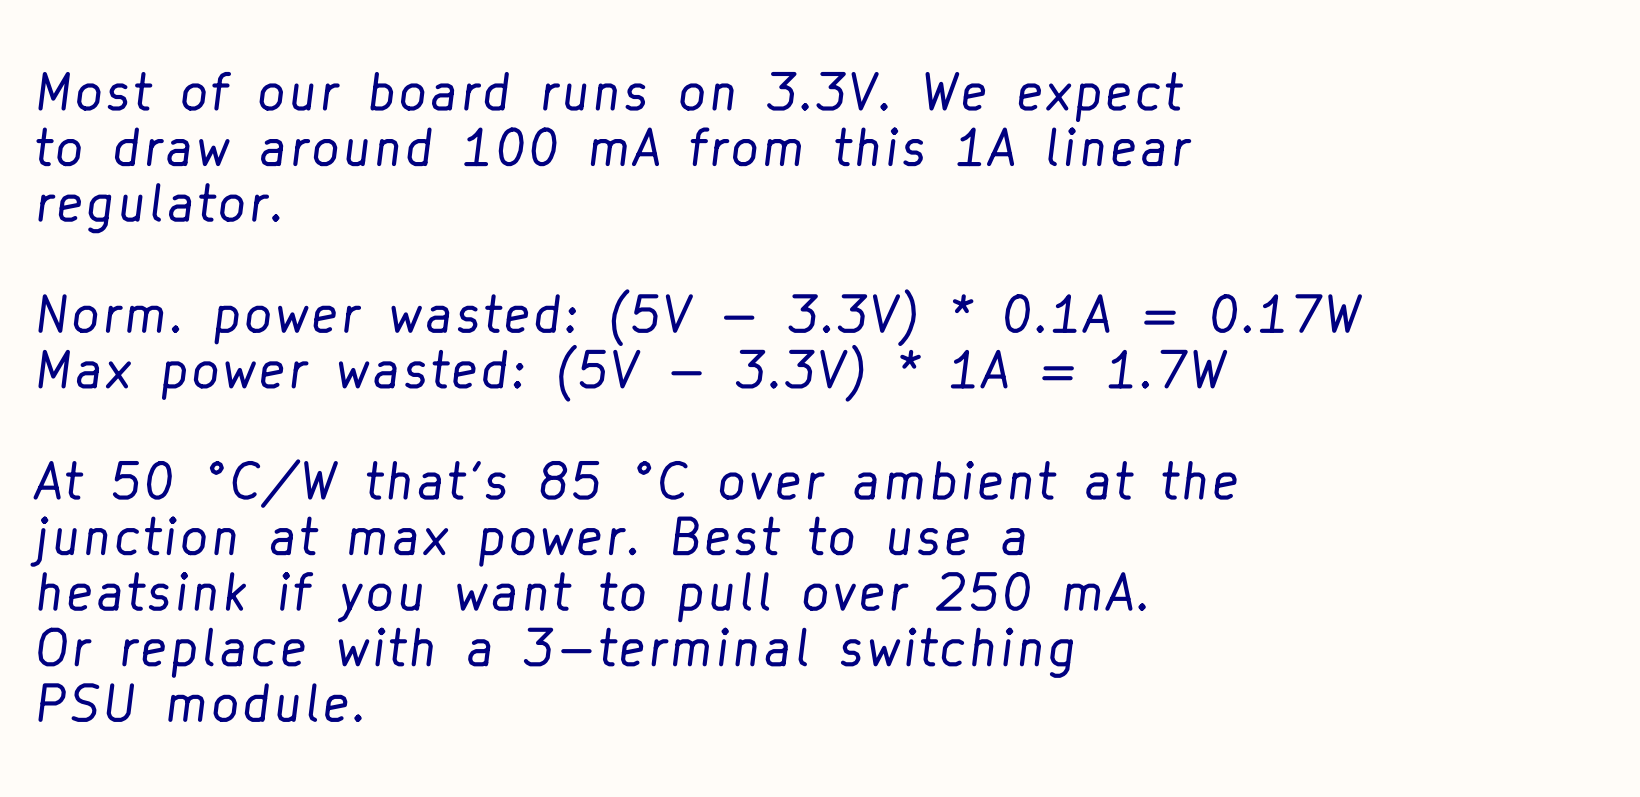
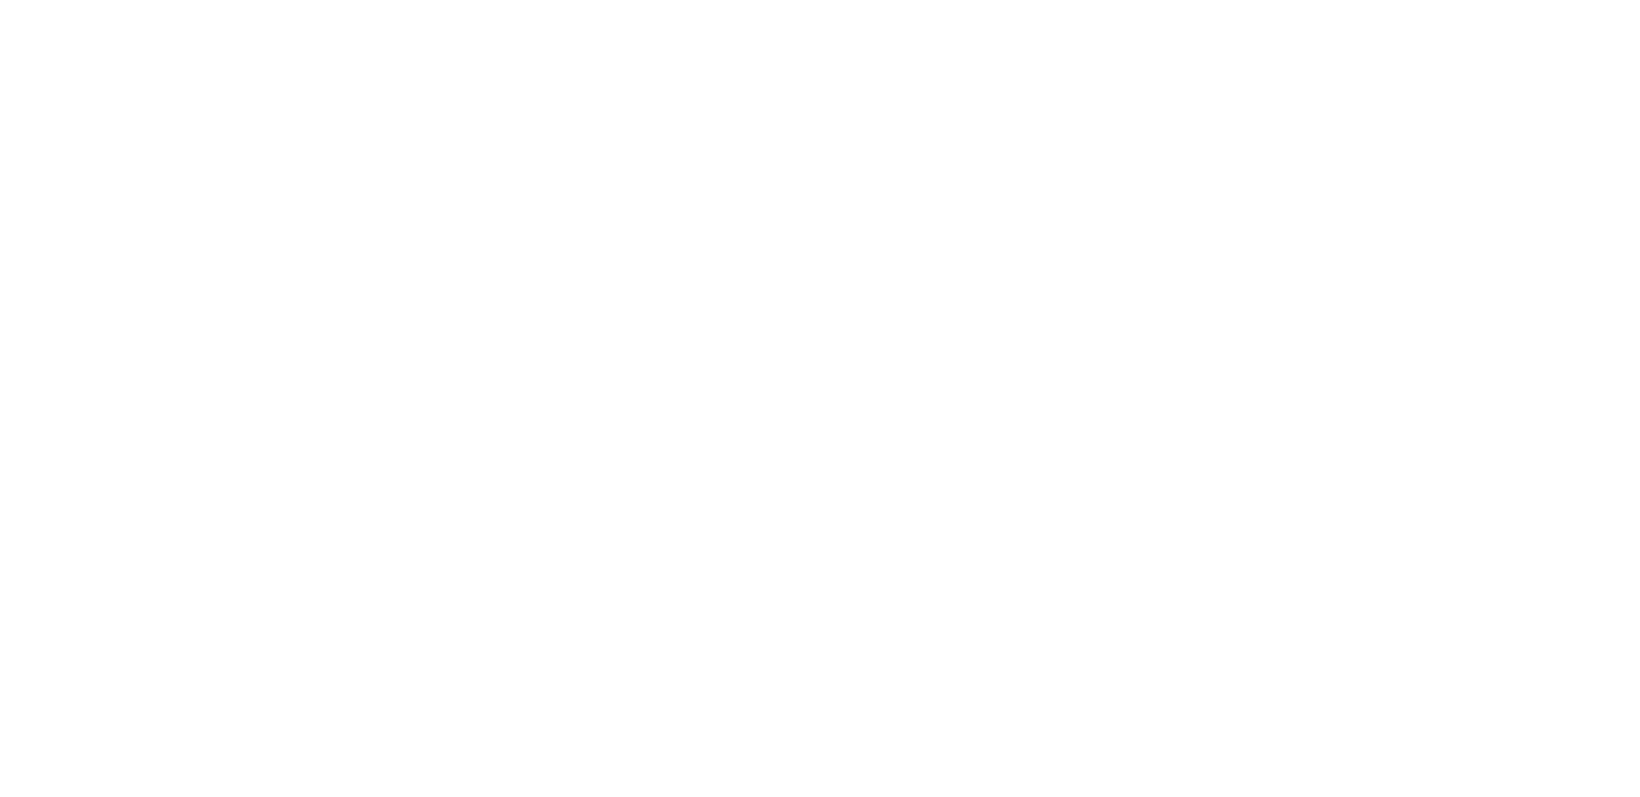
text: Most of our board runs on 3.3V. We expect (610, 97) -> none
text: to draw around 100 mA from this 1A linear (613, 146) -> none
text: regulator. (158, 208) -> none
text: Norm. power wasted: (5V - 3.3V) * 0.1A = 0.17W (700, 317) -> none
text: Max power wasted: (5V - 3.3V) * 1A = 1.7W (632, 373) -> none
text: At 50 °C/W that's 85 °C over ambient at the (635, 483) -> none
text: junction at max power. Best to use a (527, 541) -> none
text: heatsink if you want to pull over 250 mA. (592, 597) -> none
text: Or replace with a 3-terminal switching (555, 652) -> none
text: PSU module. (200, 702) -> none

